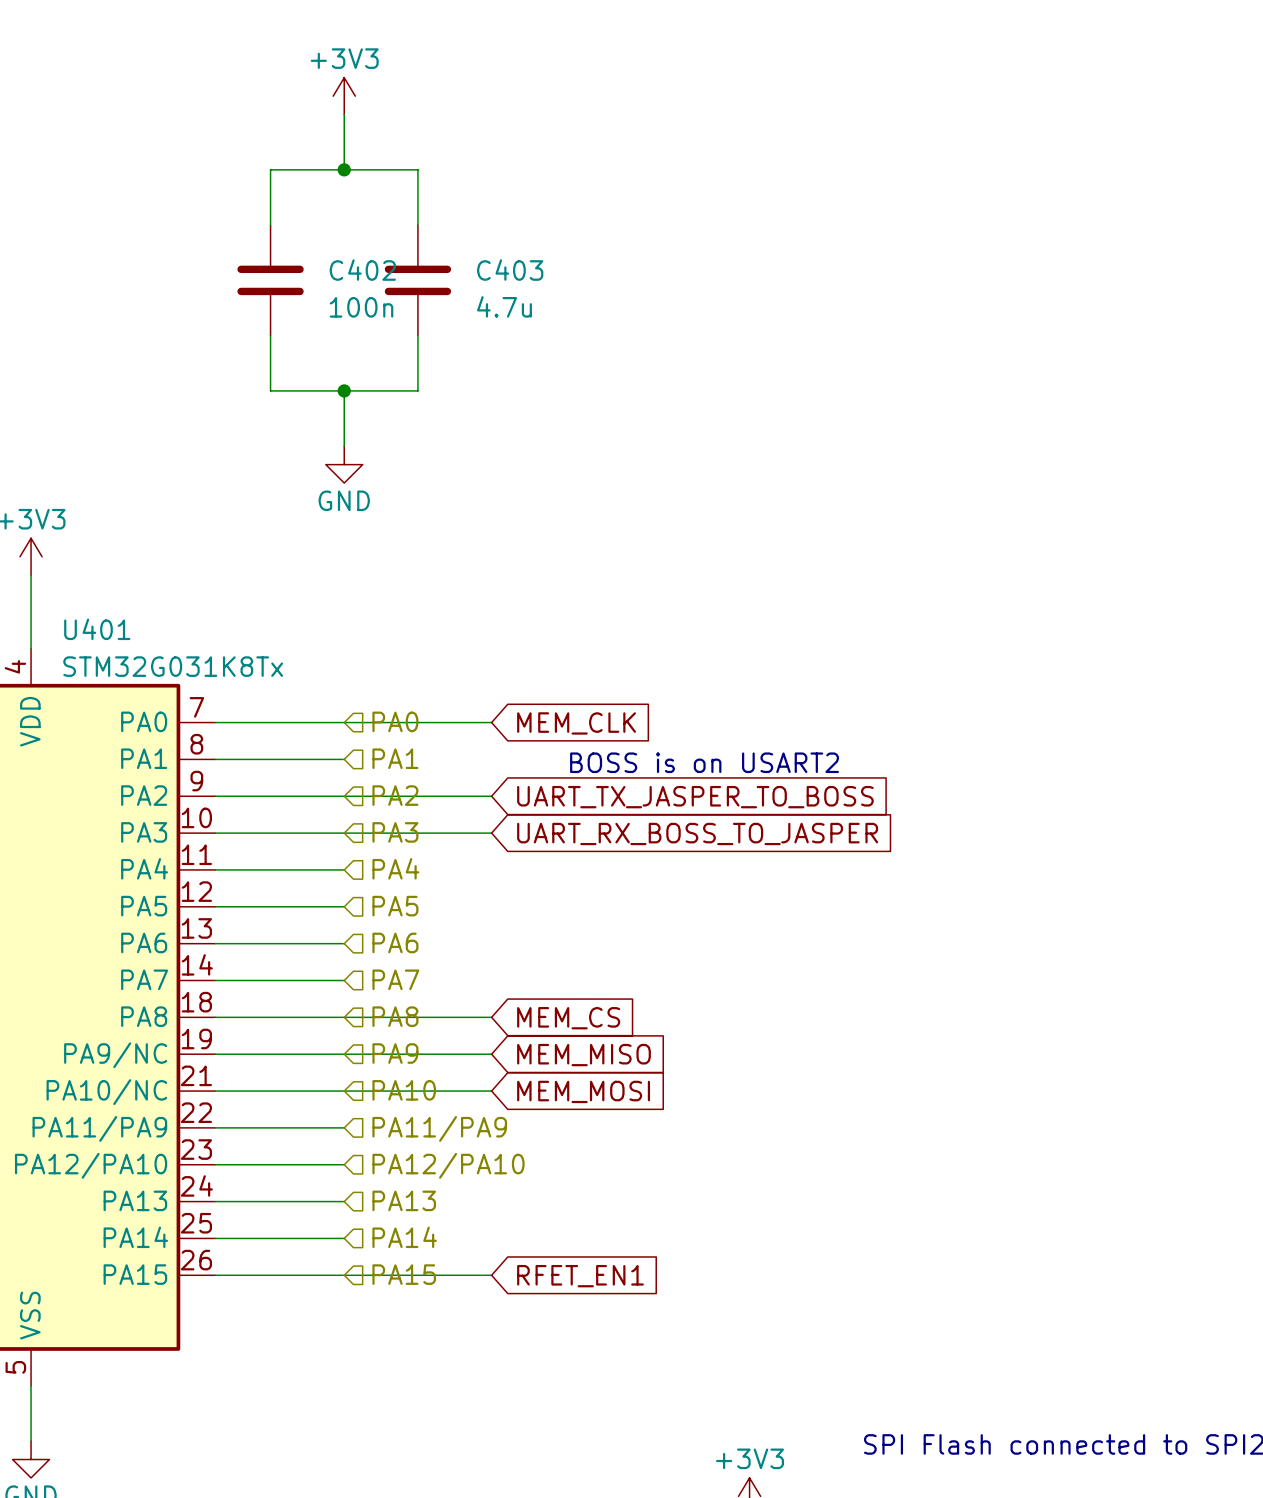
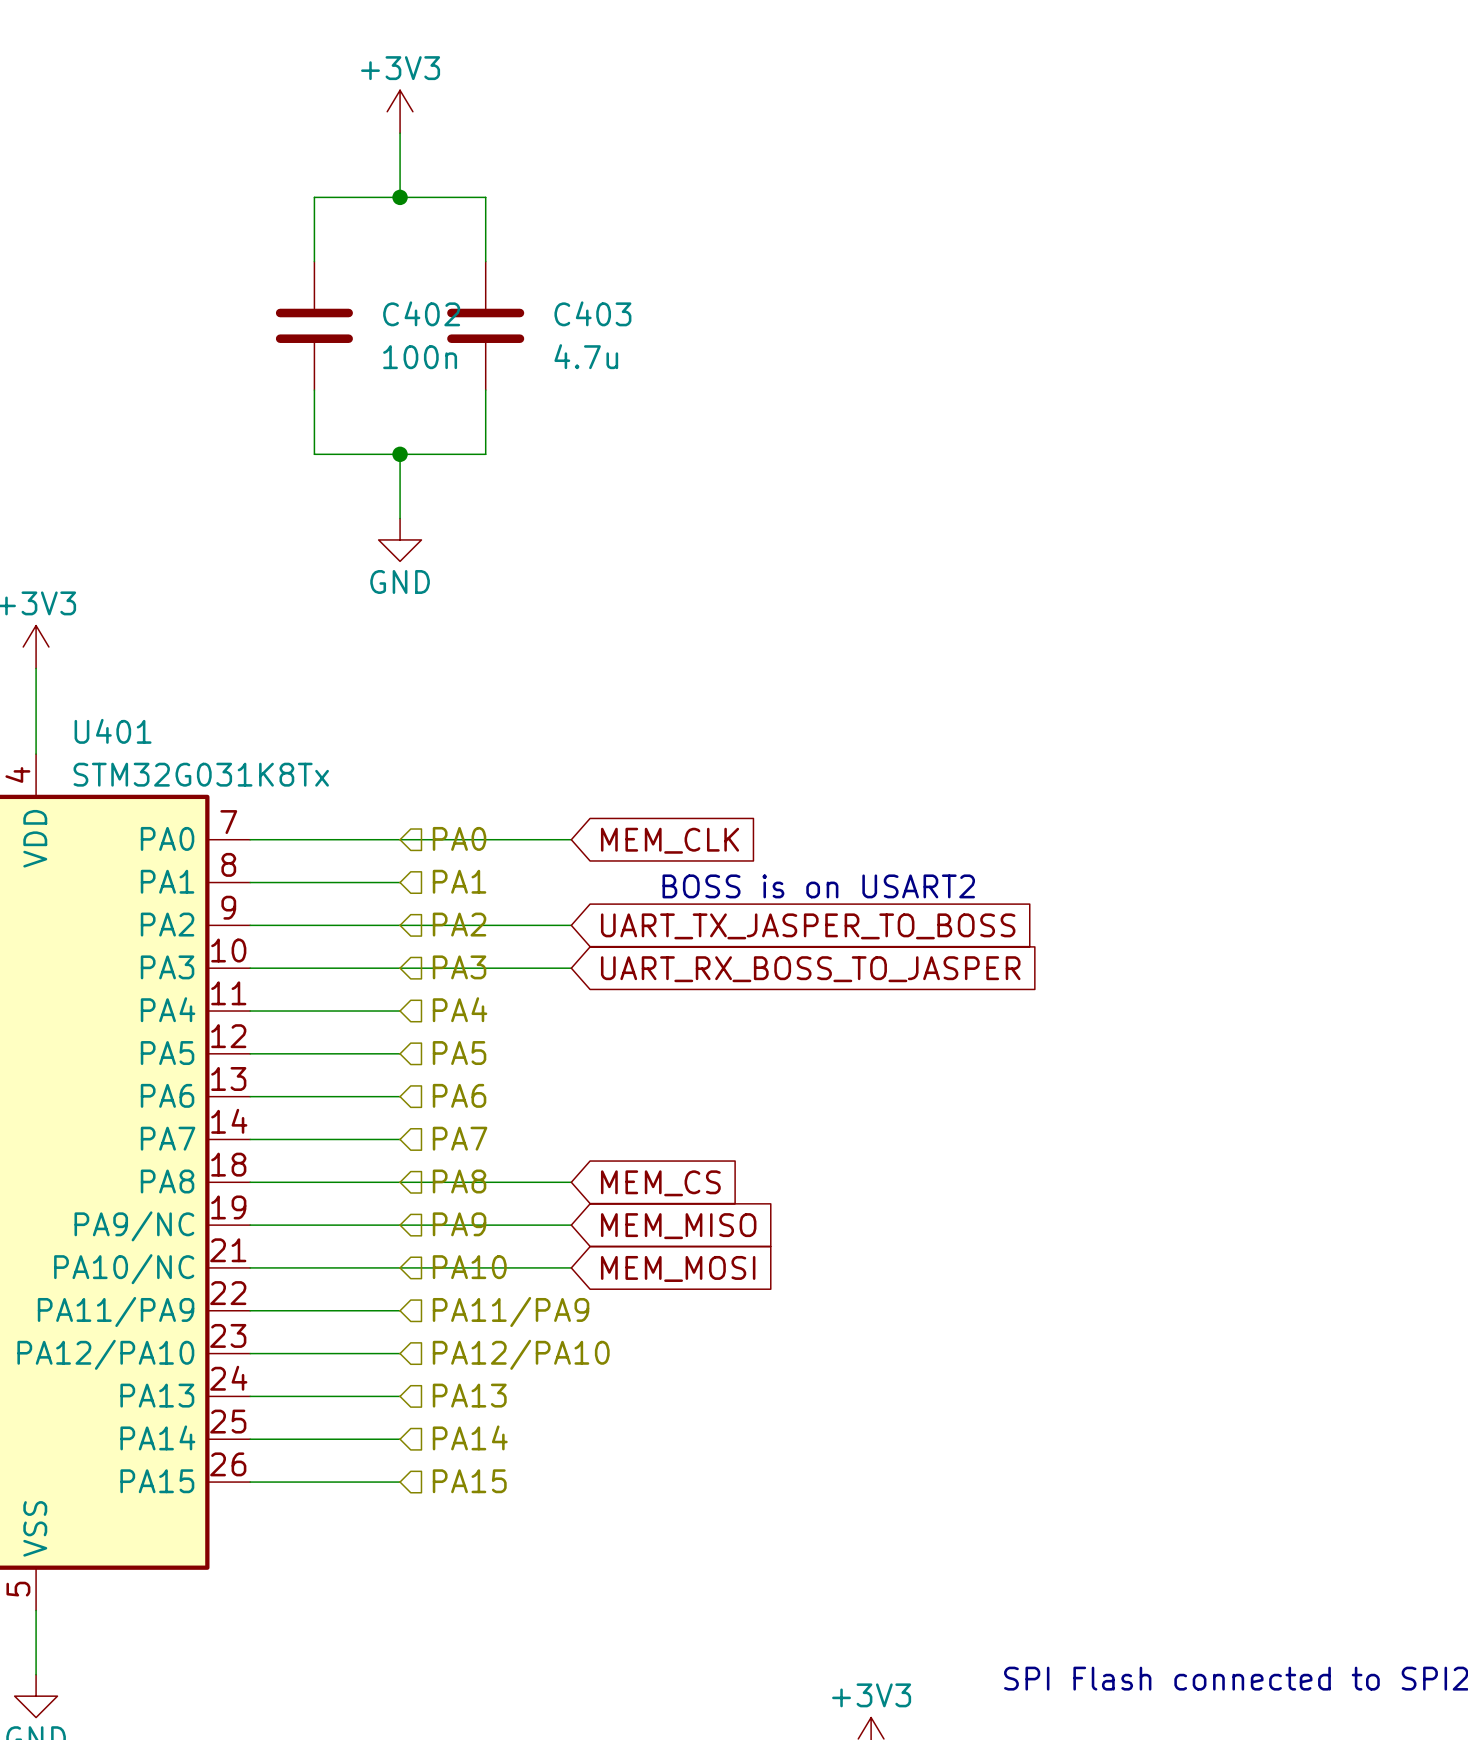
wire: (344, 1275) (491, 1275) -> none
global label: RFET_EN1 (580, 1276) -> none

